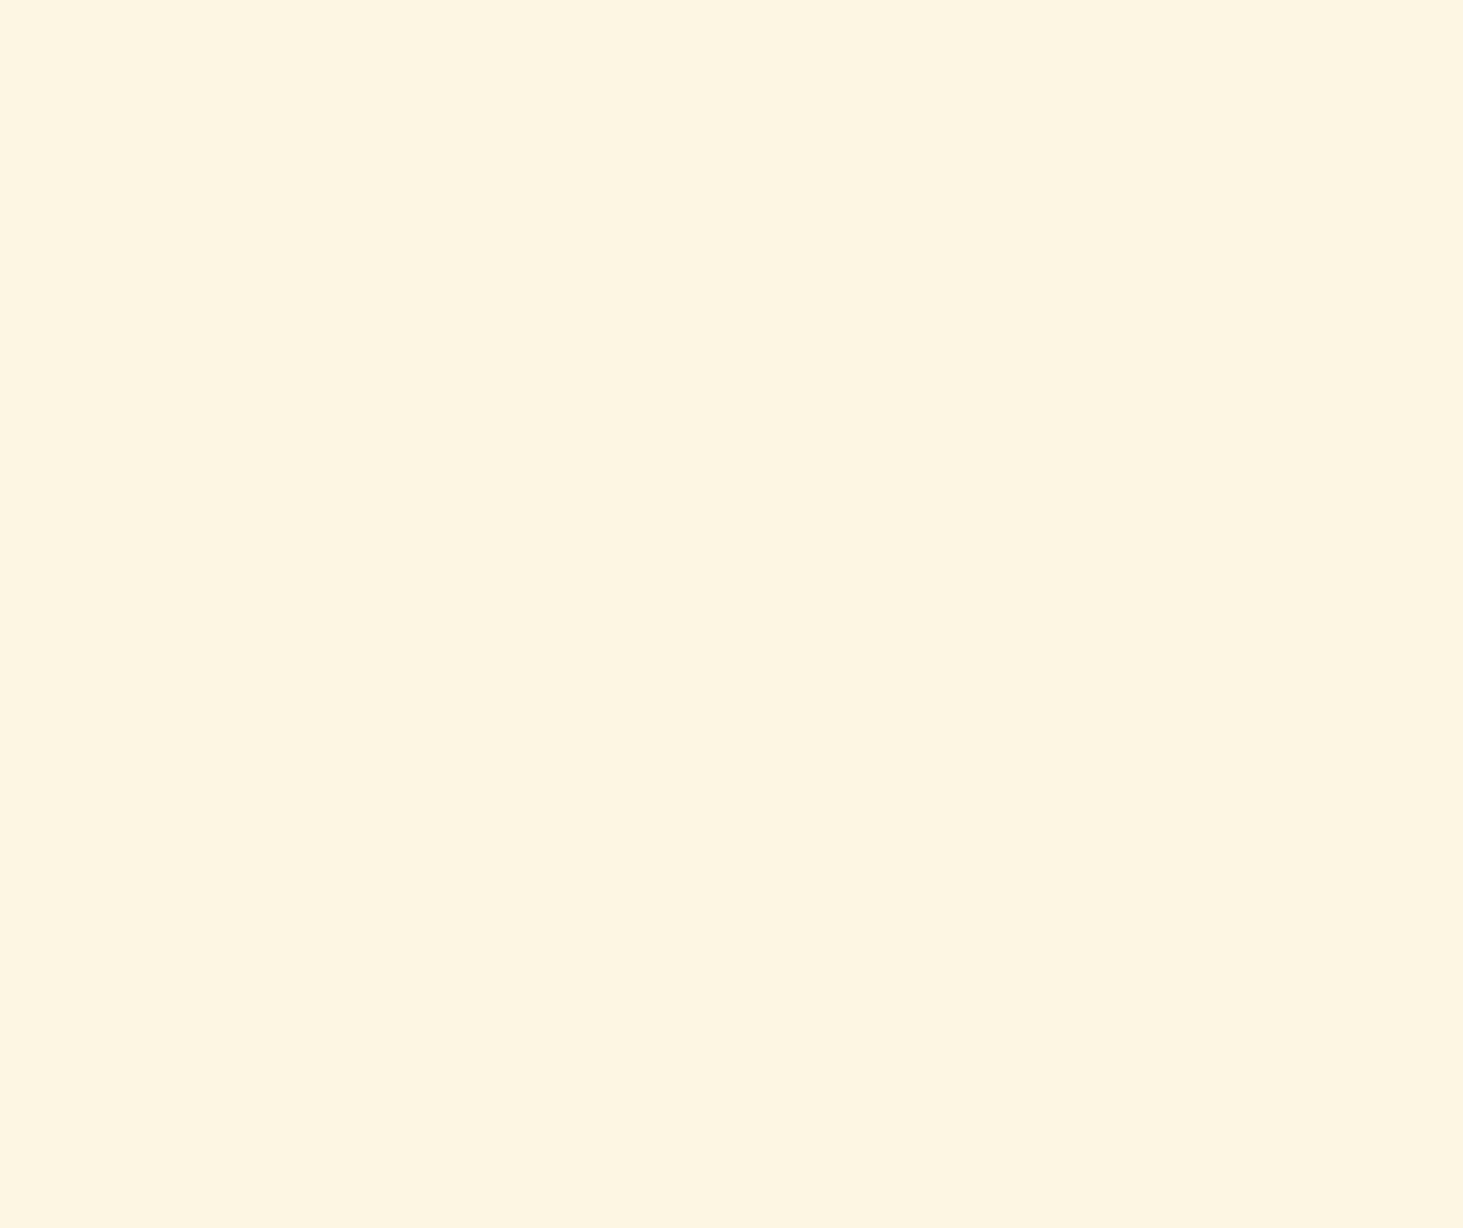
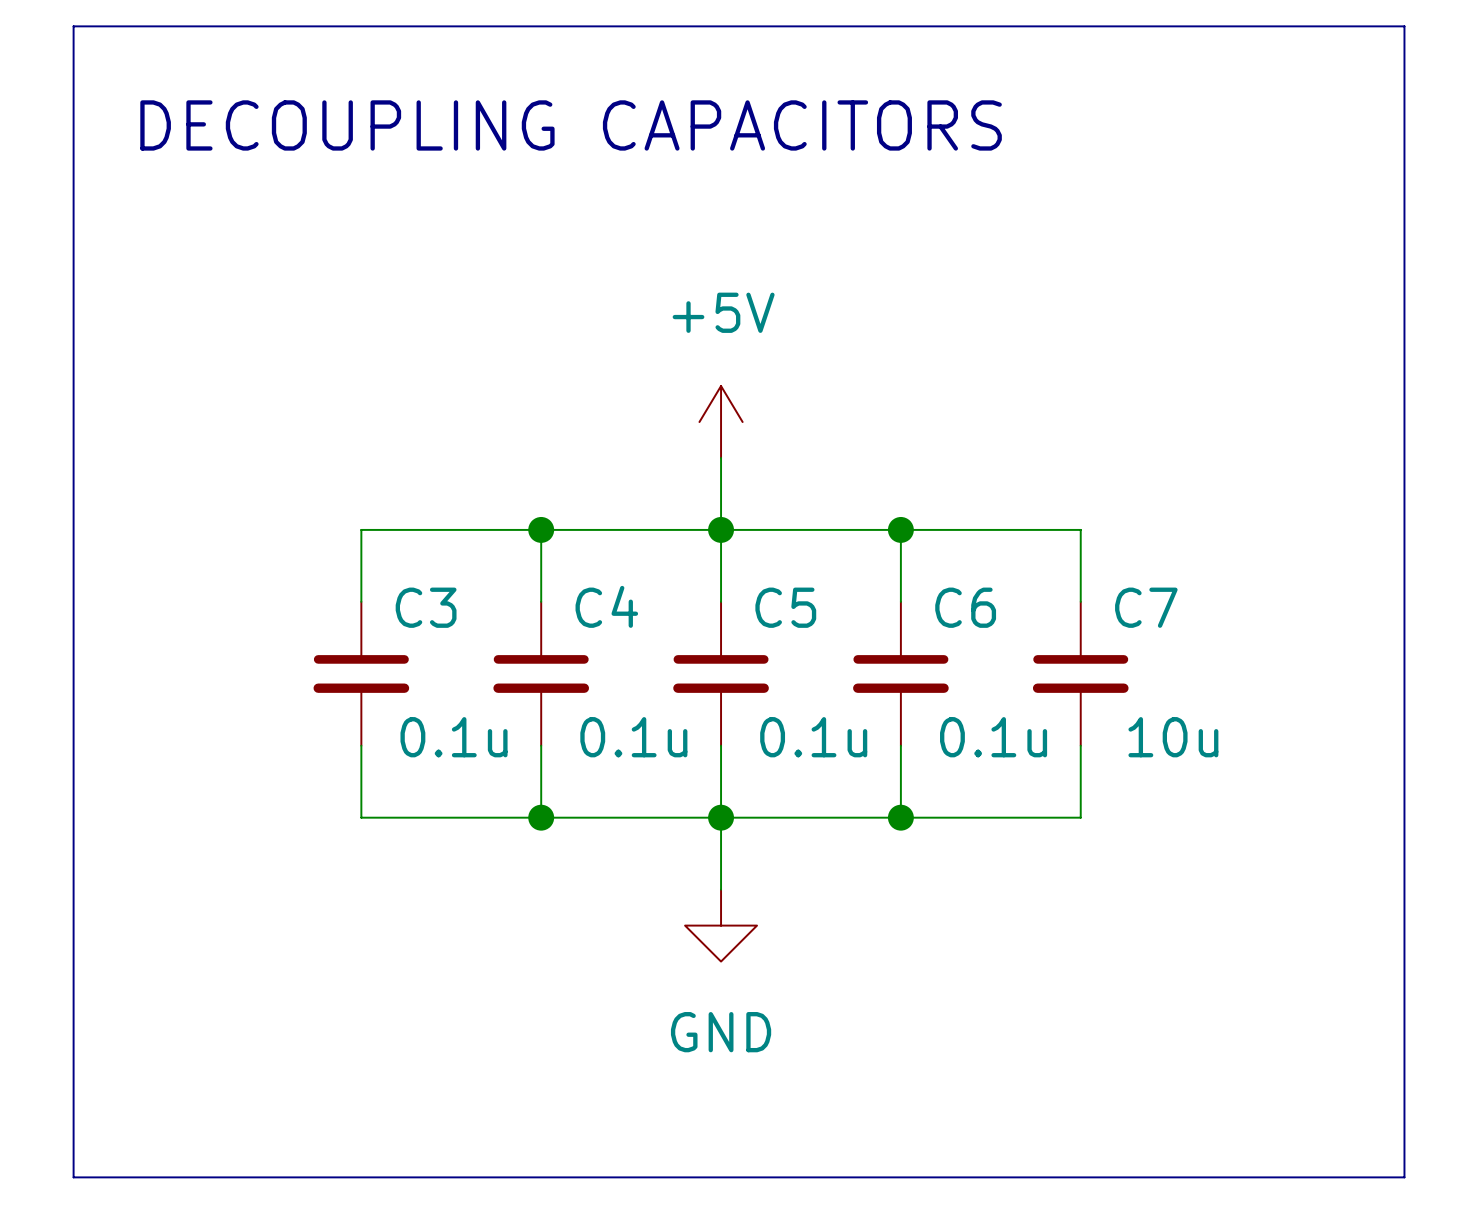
line: none -> (73, 26) (1404, 26) (1404, 1177) (73, 1177) (73, 26)
text: none -> DECOUPLING CAPACITORS (571, 125)
power symbol: none -> +5V (721, 422)
wire: none -> (721, 457) (721, 601)
wire: none -> (541, 529) (541, 601)
junction: none -> (541, 529)
junction: none -> (721, 529)
wire: none -> (900, 529) (900, 601)
junction: none -> (900, 529)
wire: none -> (361, 601) (361, 529) (1080, 529) (1080, 601)
C3: none -> 0.1u (361, 673)
C4: none -> 0.1u (541, 673)
C5: none -> 0.1u (721, 673)
C6: none -> 0.1u (900, 673)
C7: none -> 10u (1080, 673)
wire: none -> (361, 745) (361, 817) (1080, 817) (1080, 745)
wire: none -> (541, 745) (541, 817)
wire: none -> (721, 745) (721, 889)
wire: none -> (900, 745) (900, 817)
junction: none -> (541, 817)
junction: none -> (721, 817)
junction: none -> (900, 817)
power symbol: none -> GND (721, 925)

